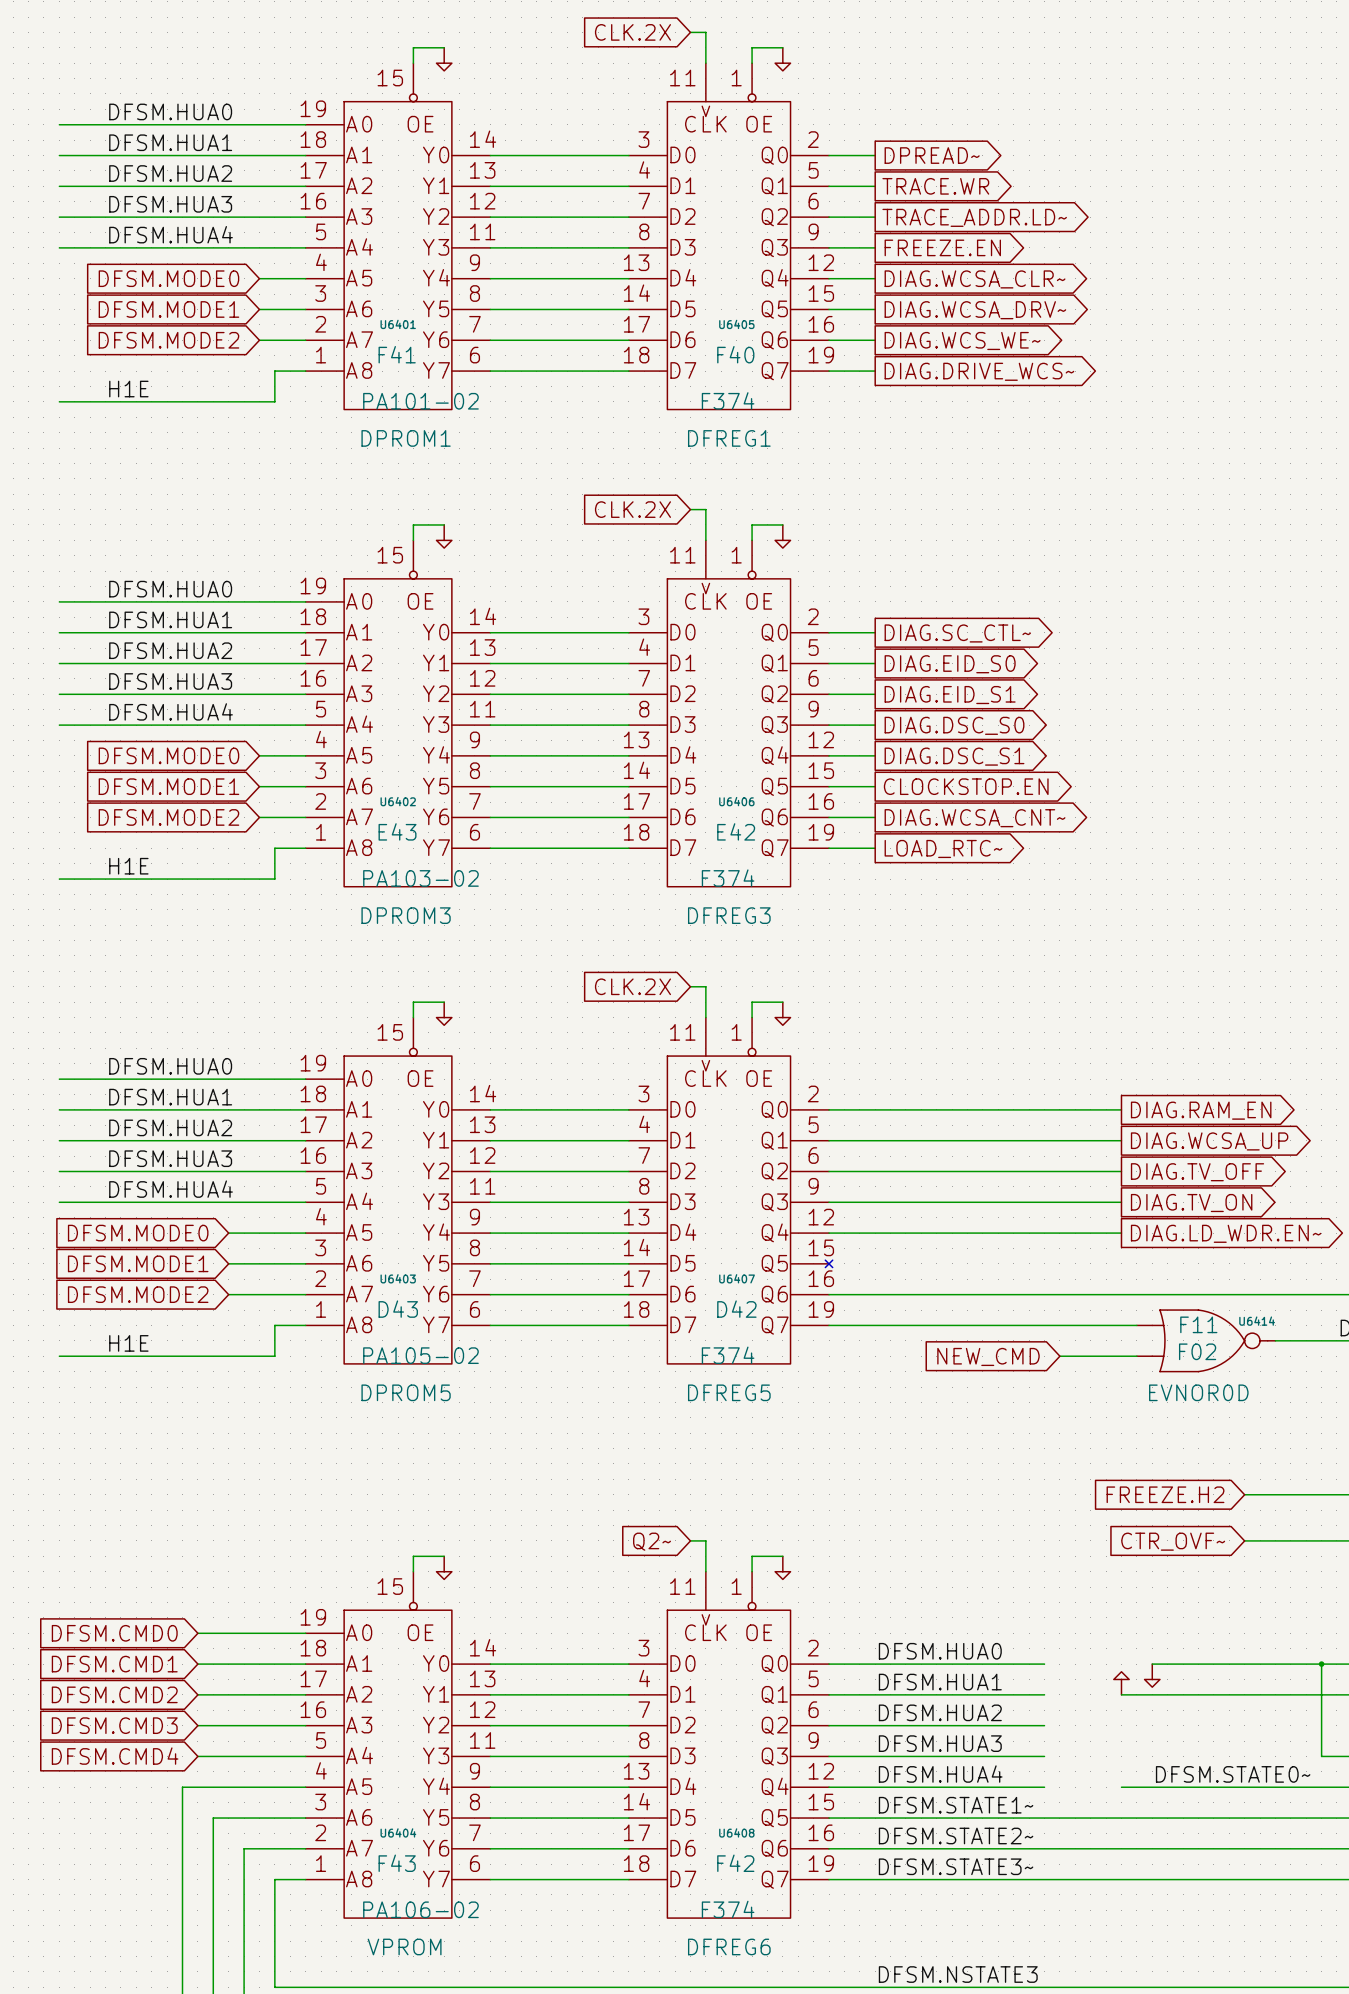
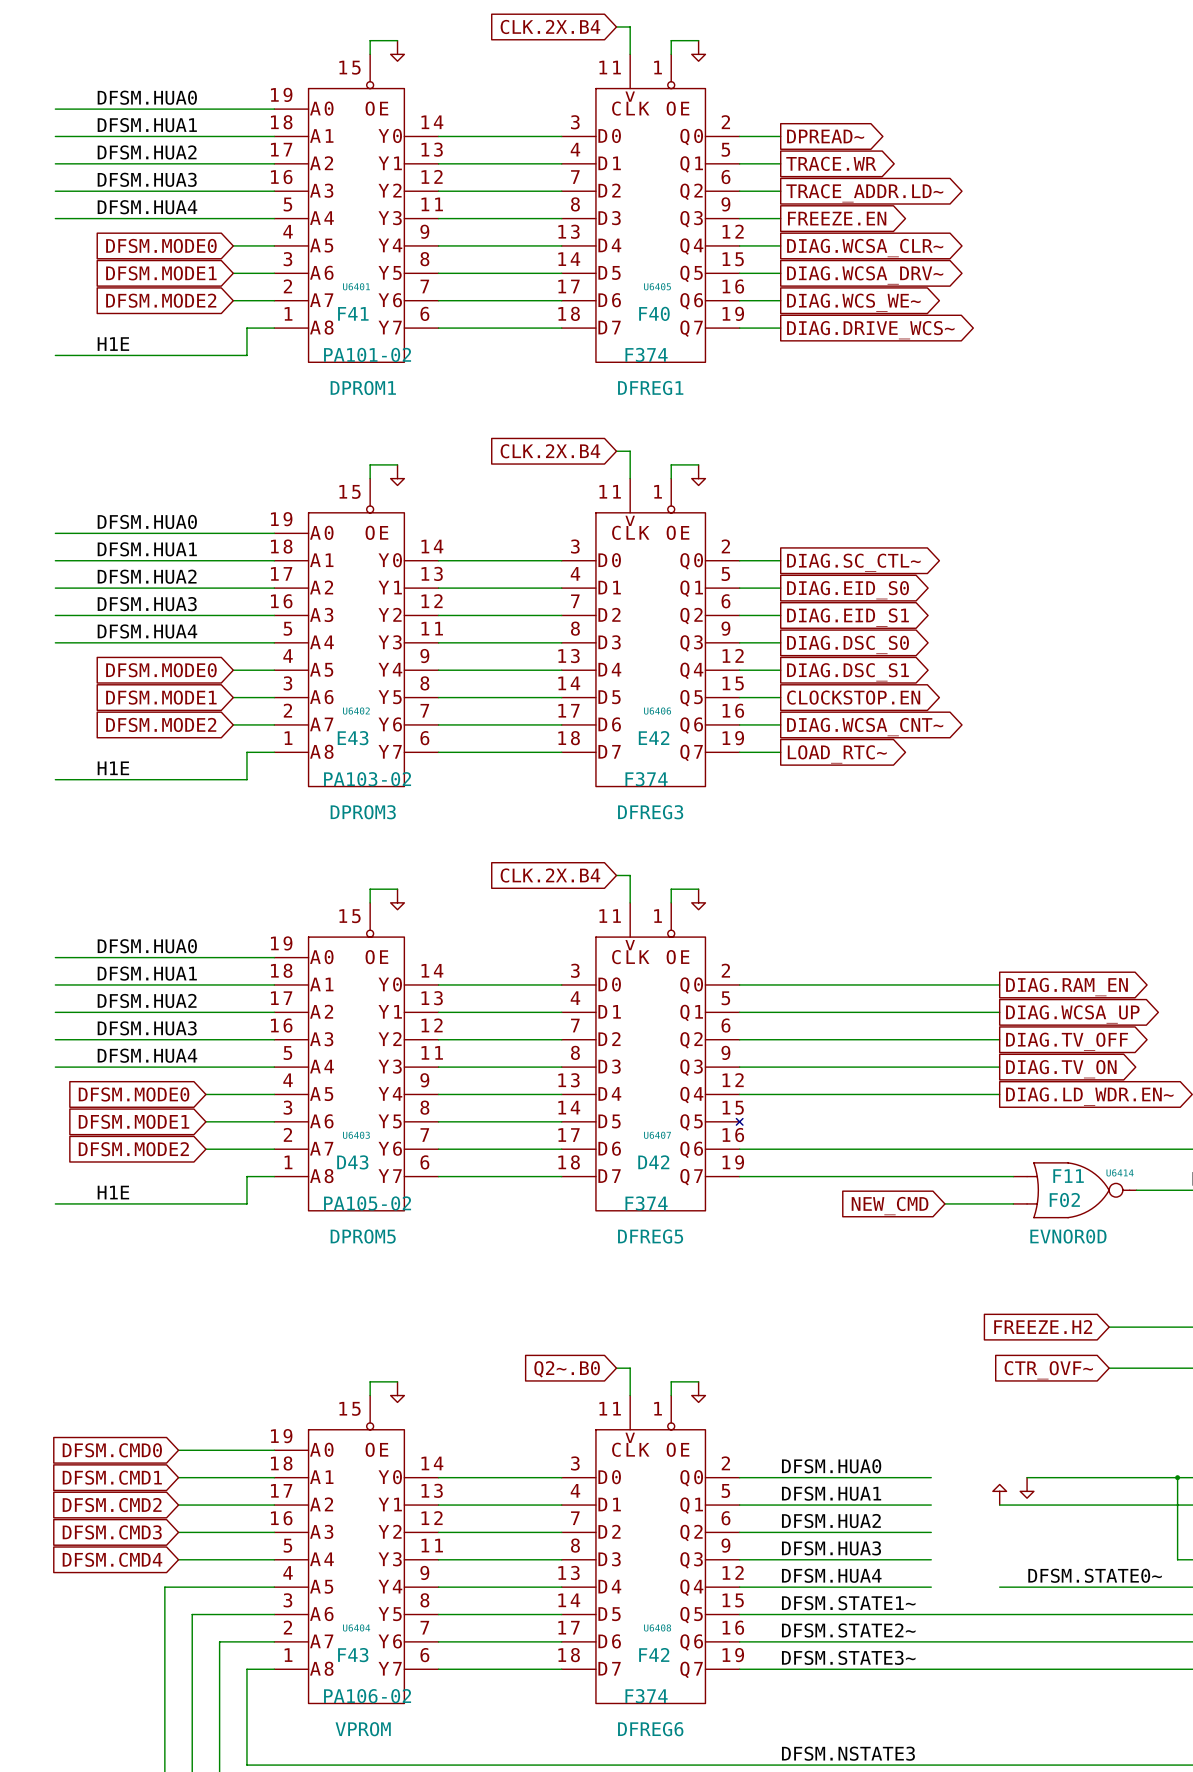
global label: CLK.2X (632, 32) -> CLK.2X.B4 (550, 27)
global label: CLK.2X (632, 509) -> CLK.2X.B4 (550, 451)
global label: CLK.2X (632, 986) -> CLK.2X.B4 (550, 875)
global label: Q2~ (652, 1541) -> Q2~.B0 (567, 1369)

